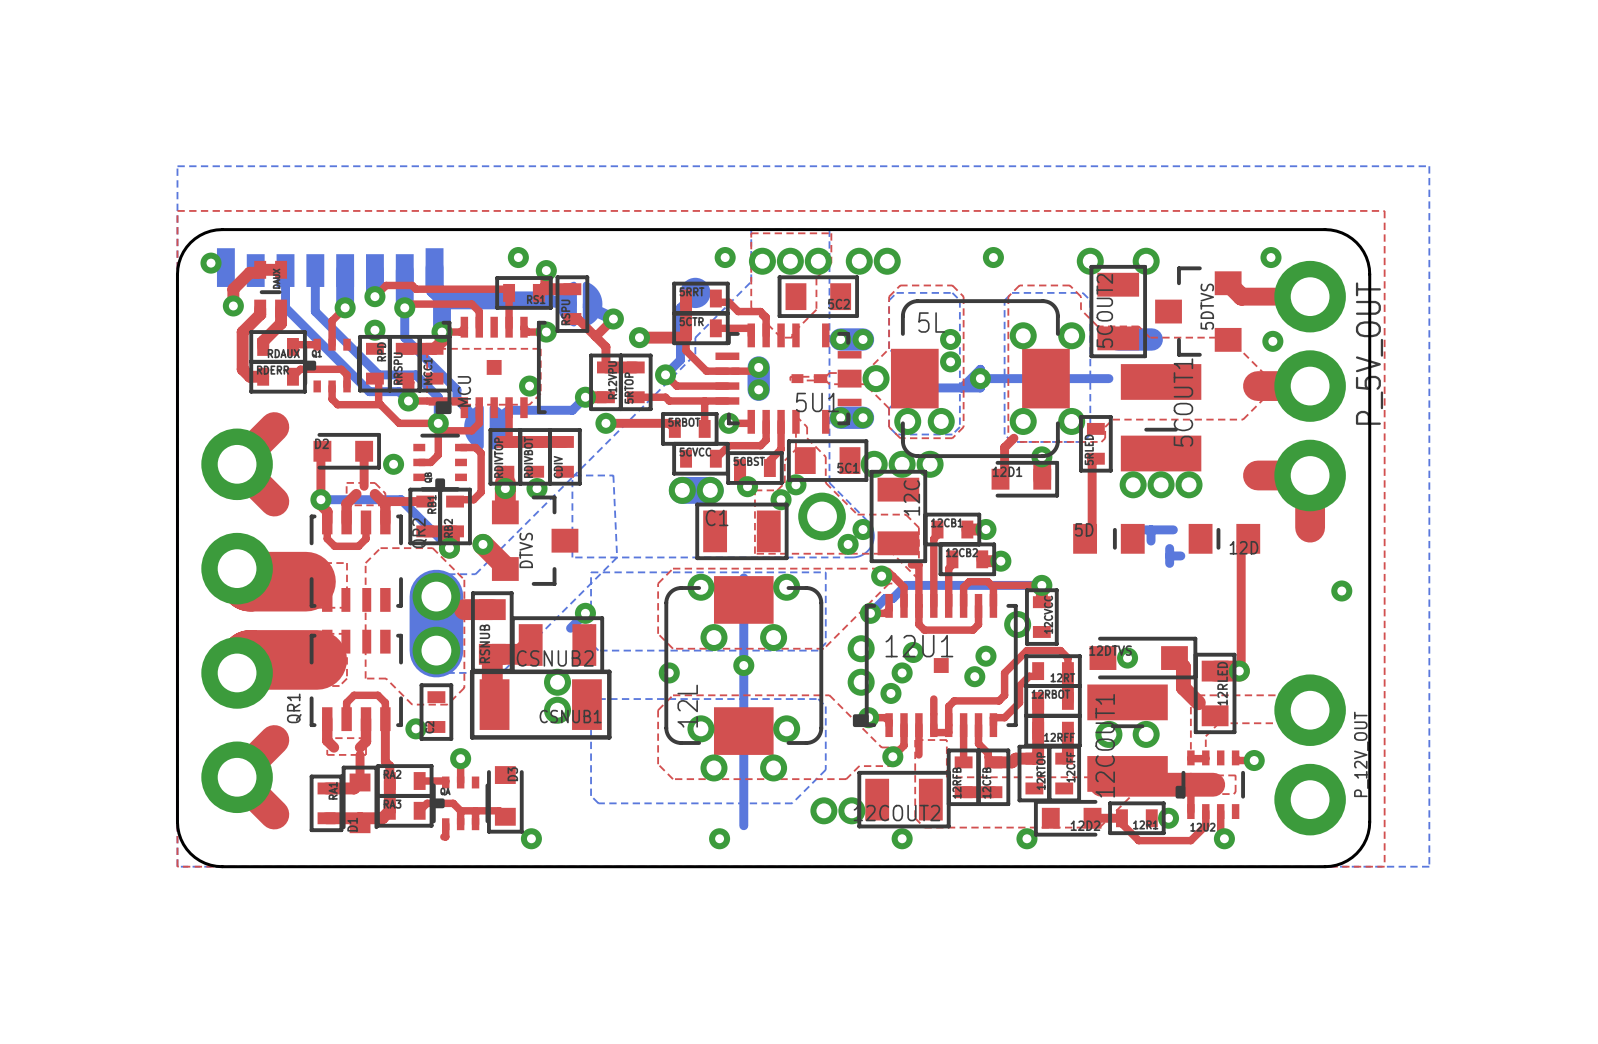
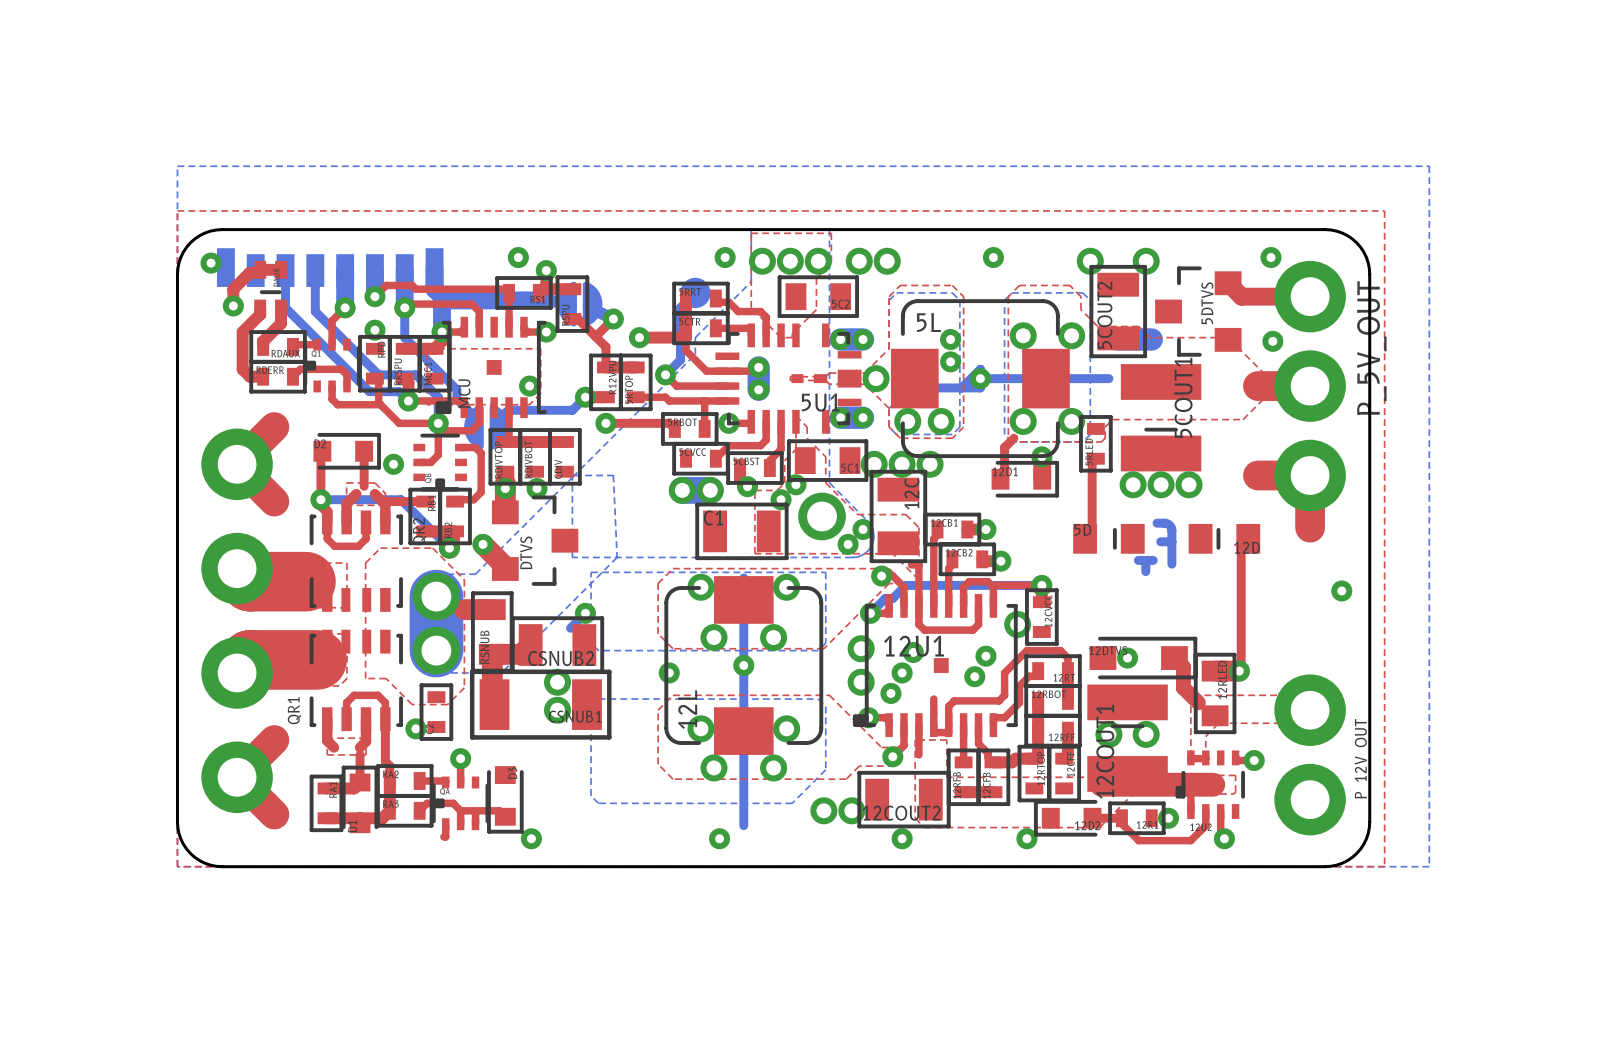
drawing shape: [1127, 525, 1186, 568] -> [1133, 518, 1177, 577]

